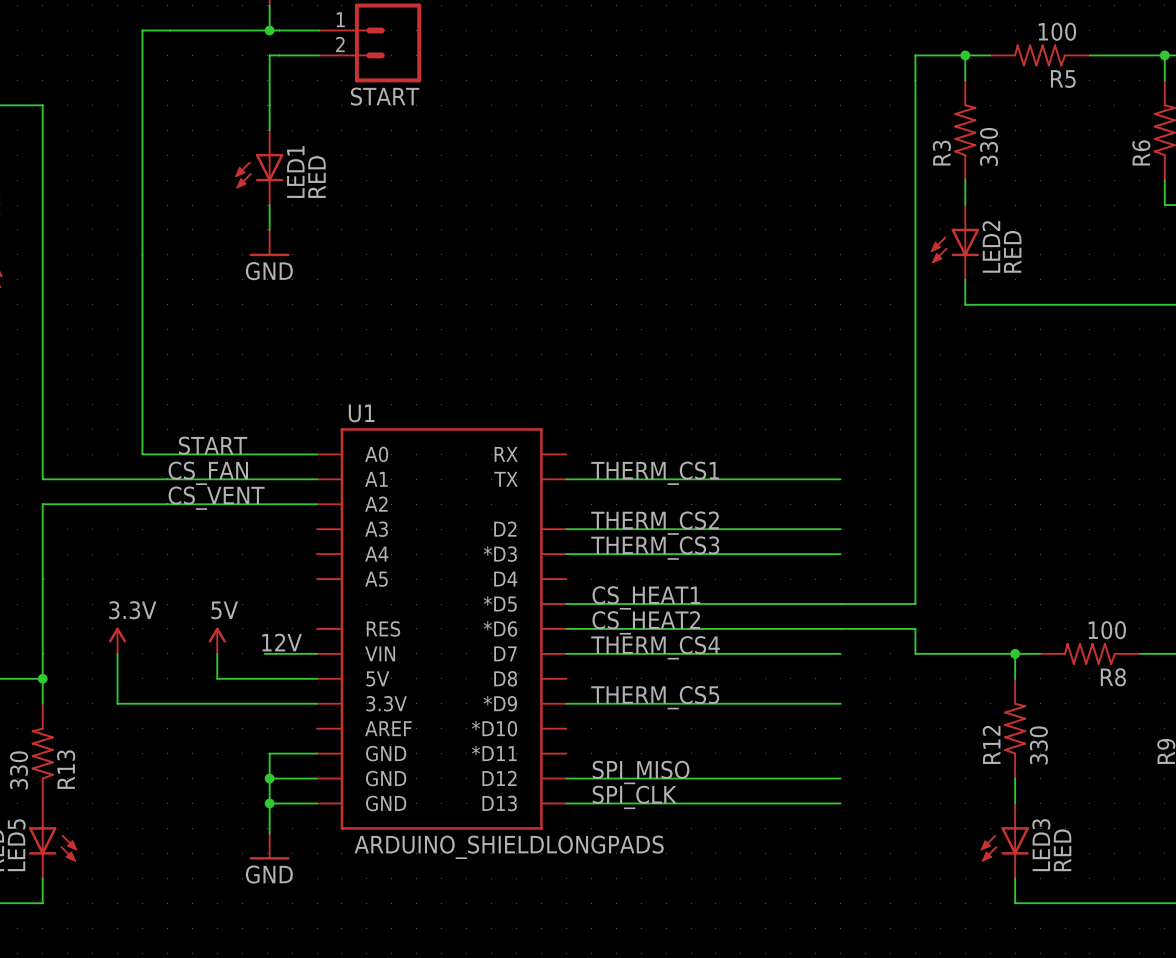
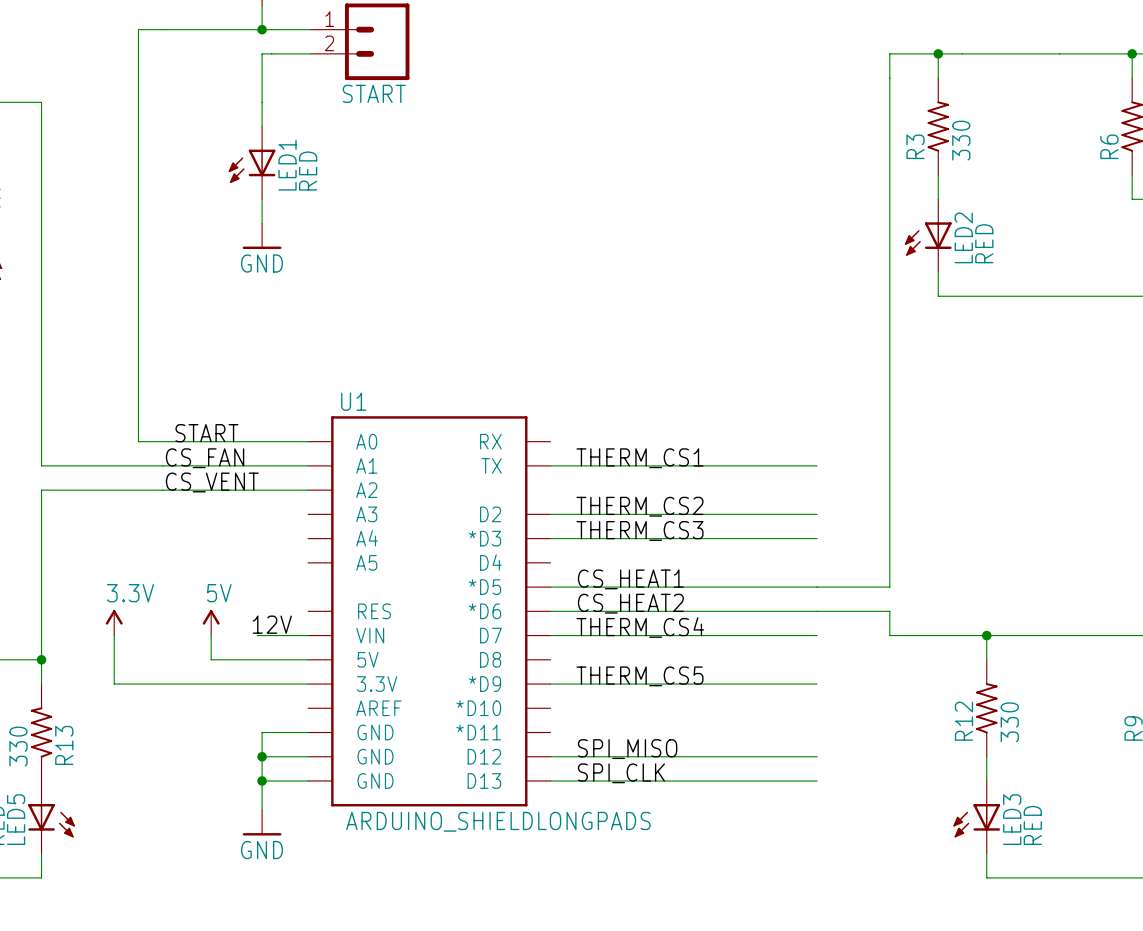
R5: 100 (1040, 55) -> none
R8: 100 (1089, 653) -> none

